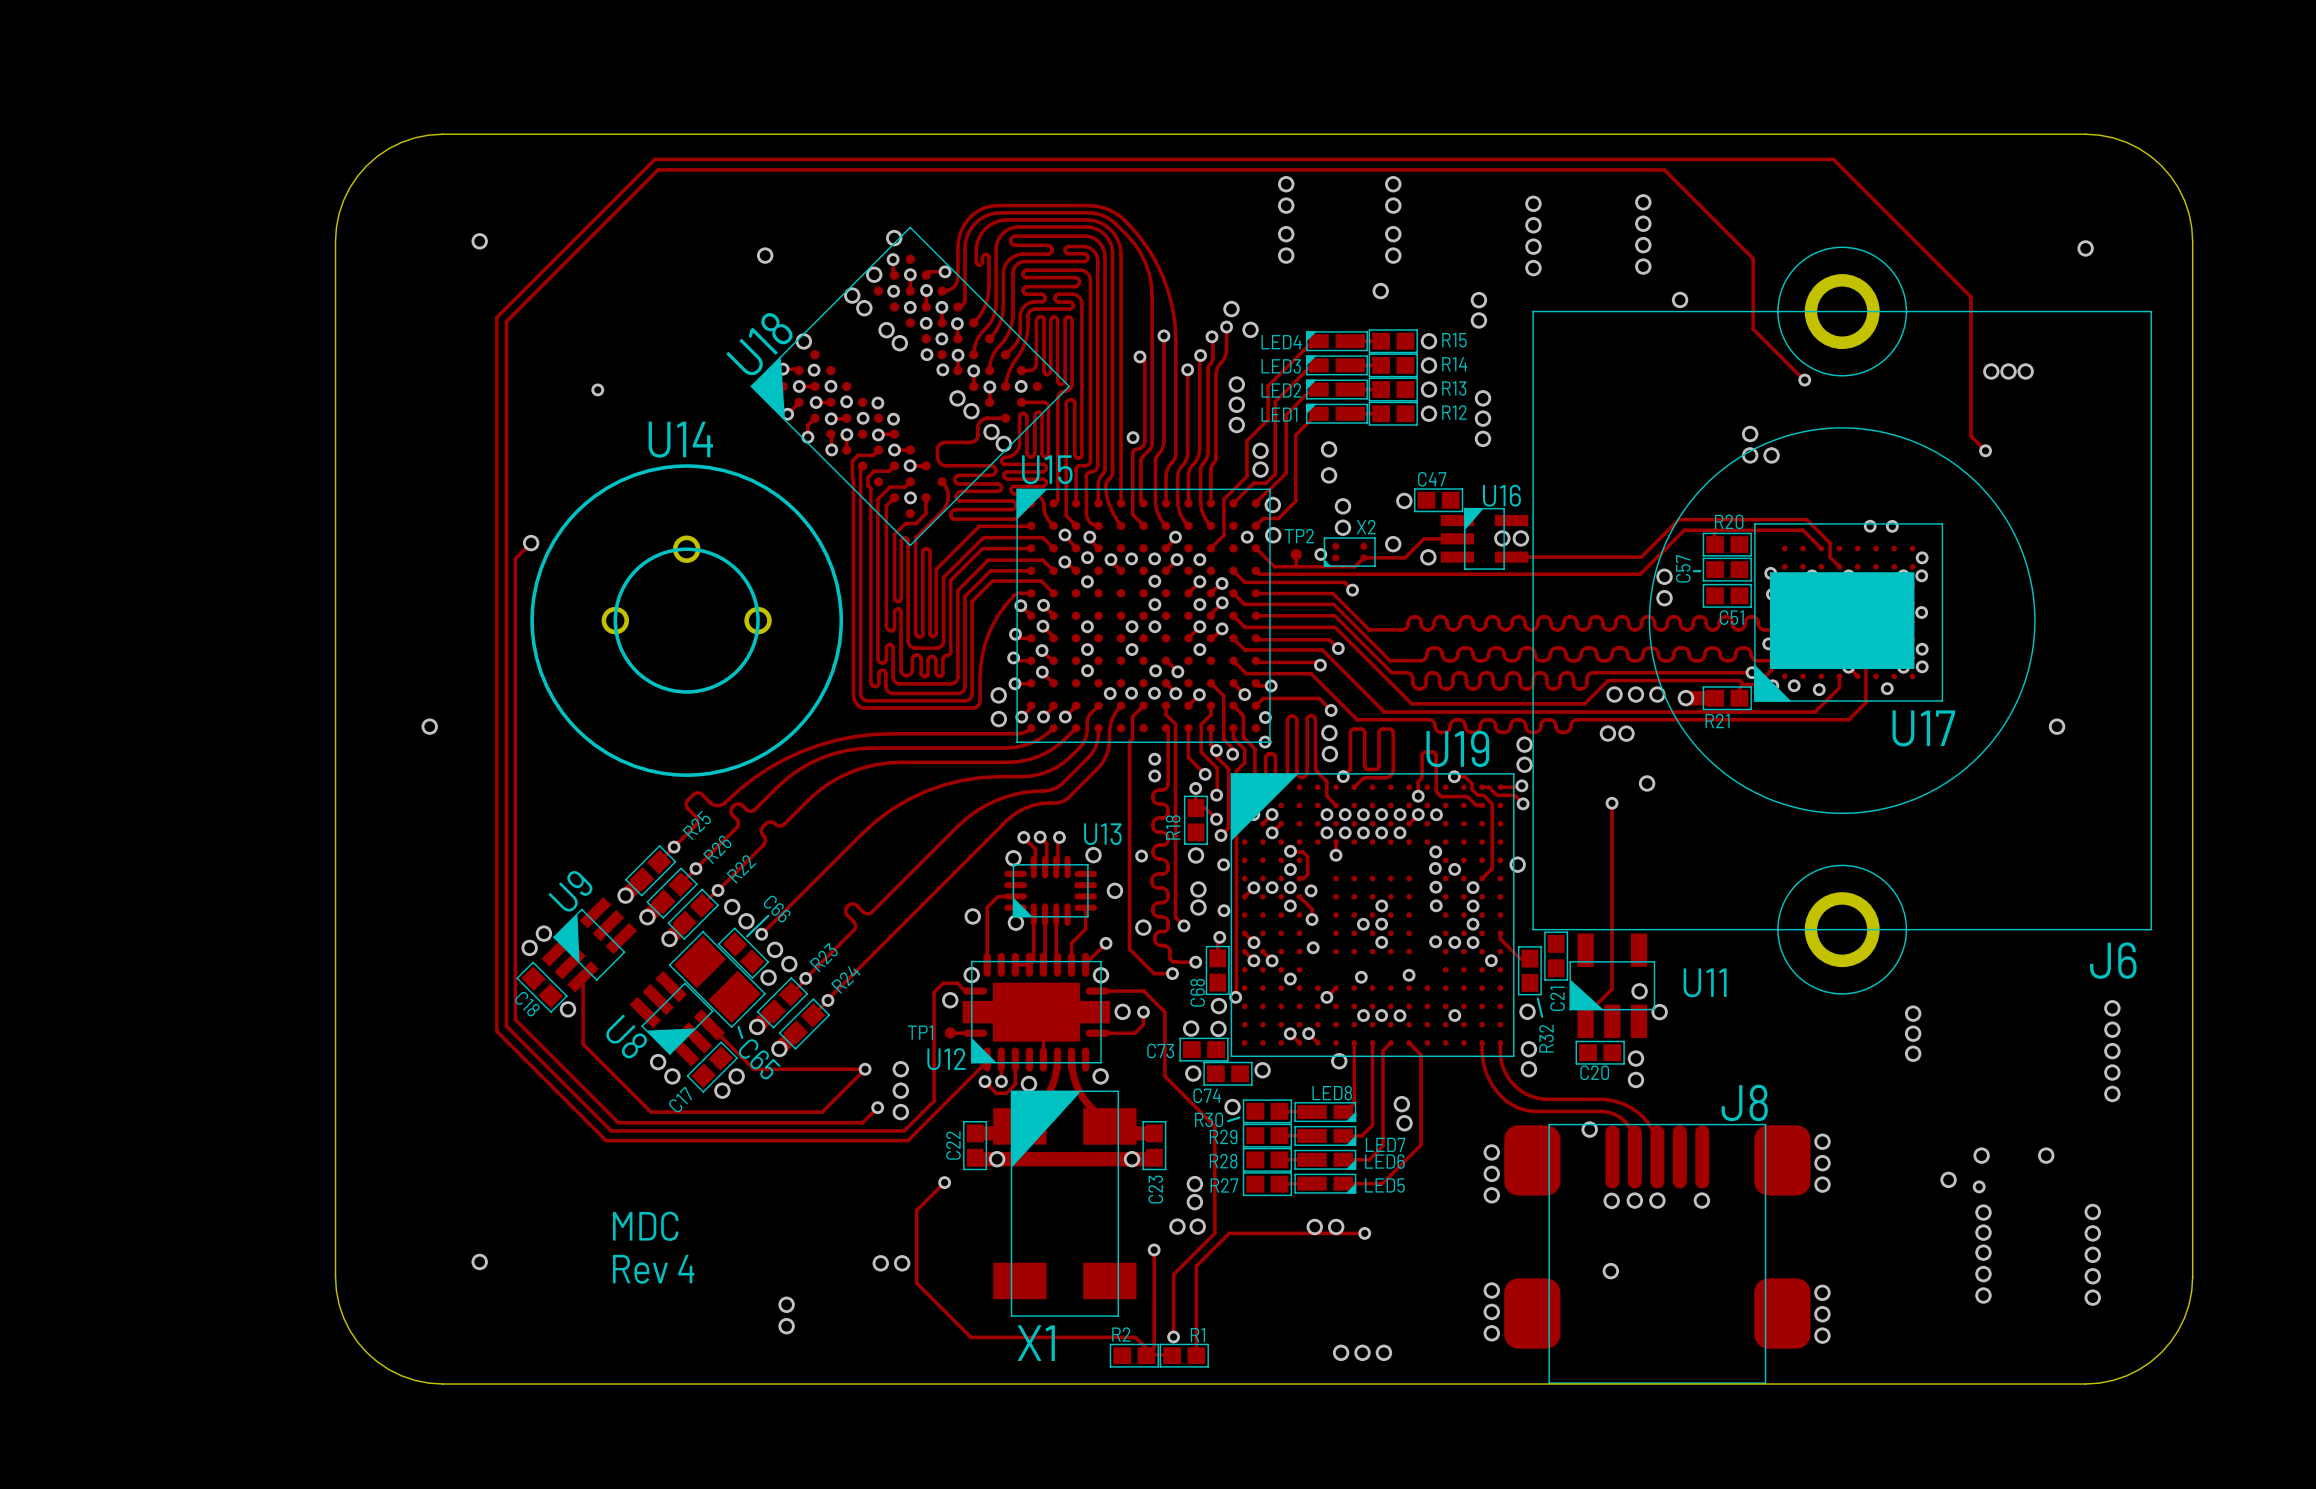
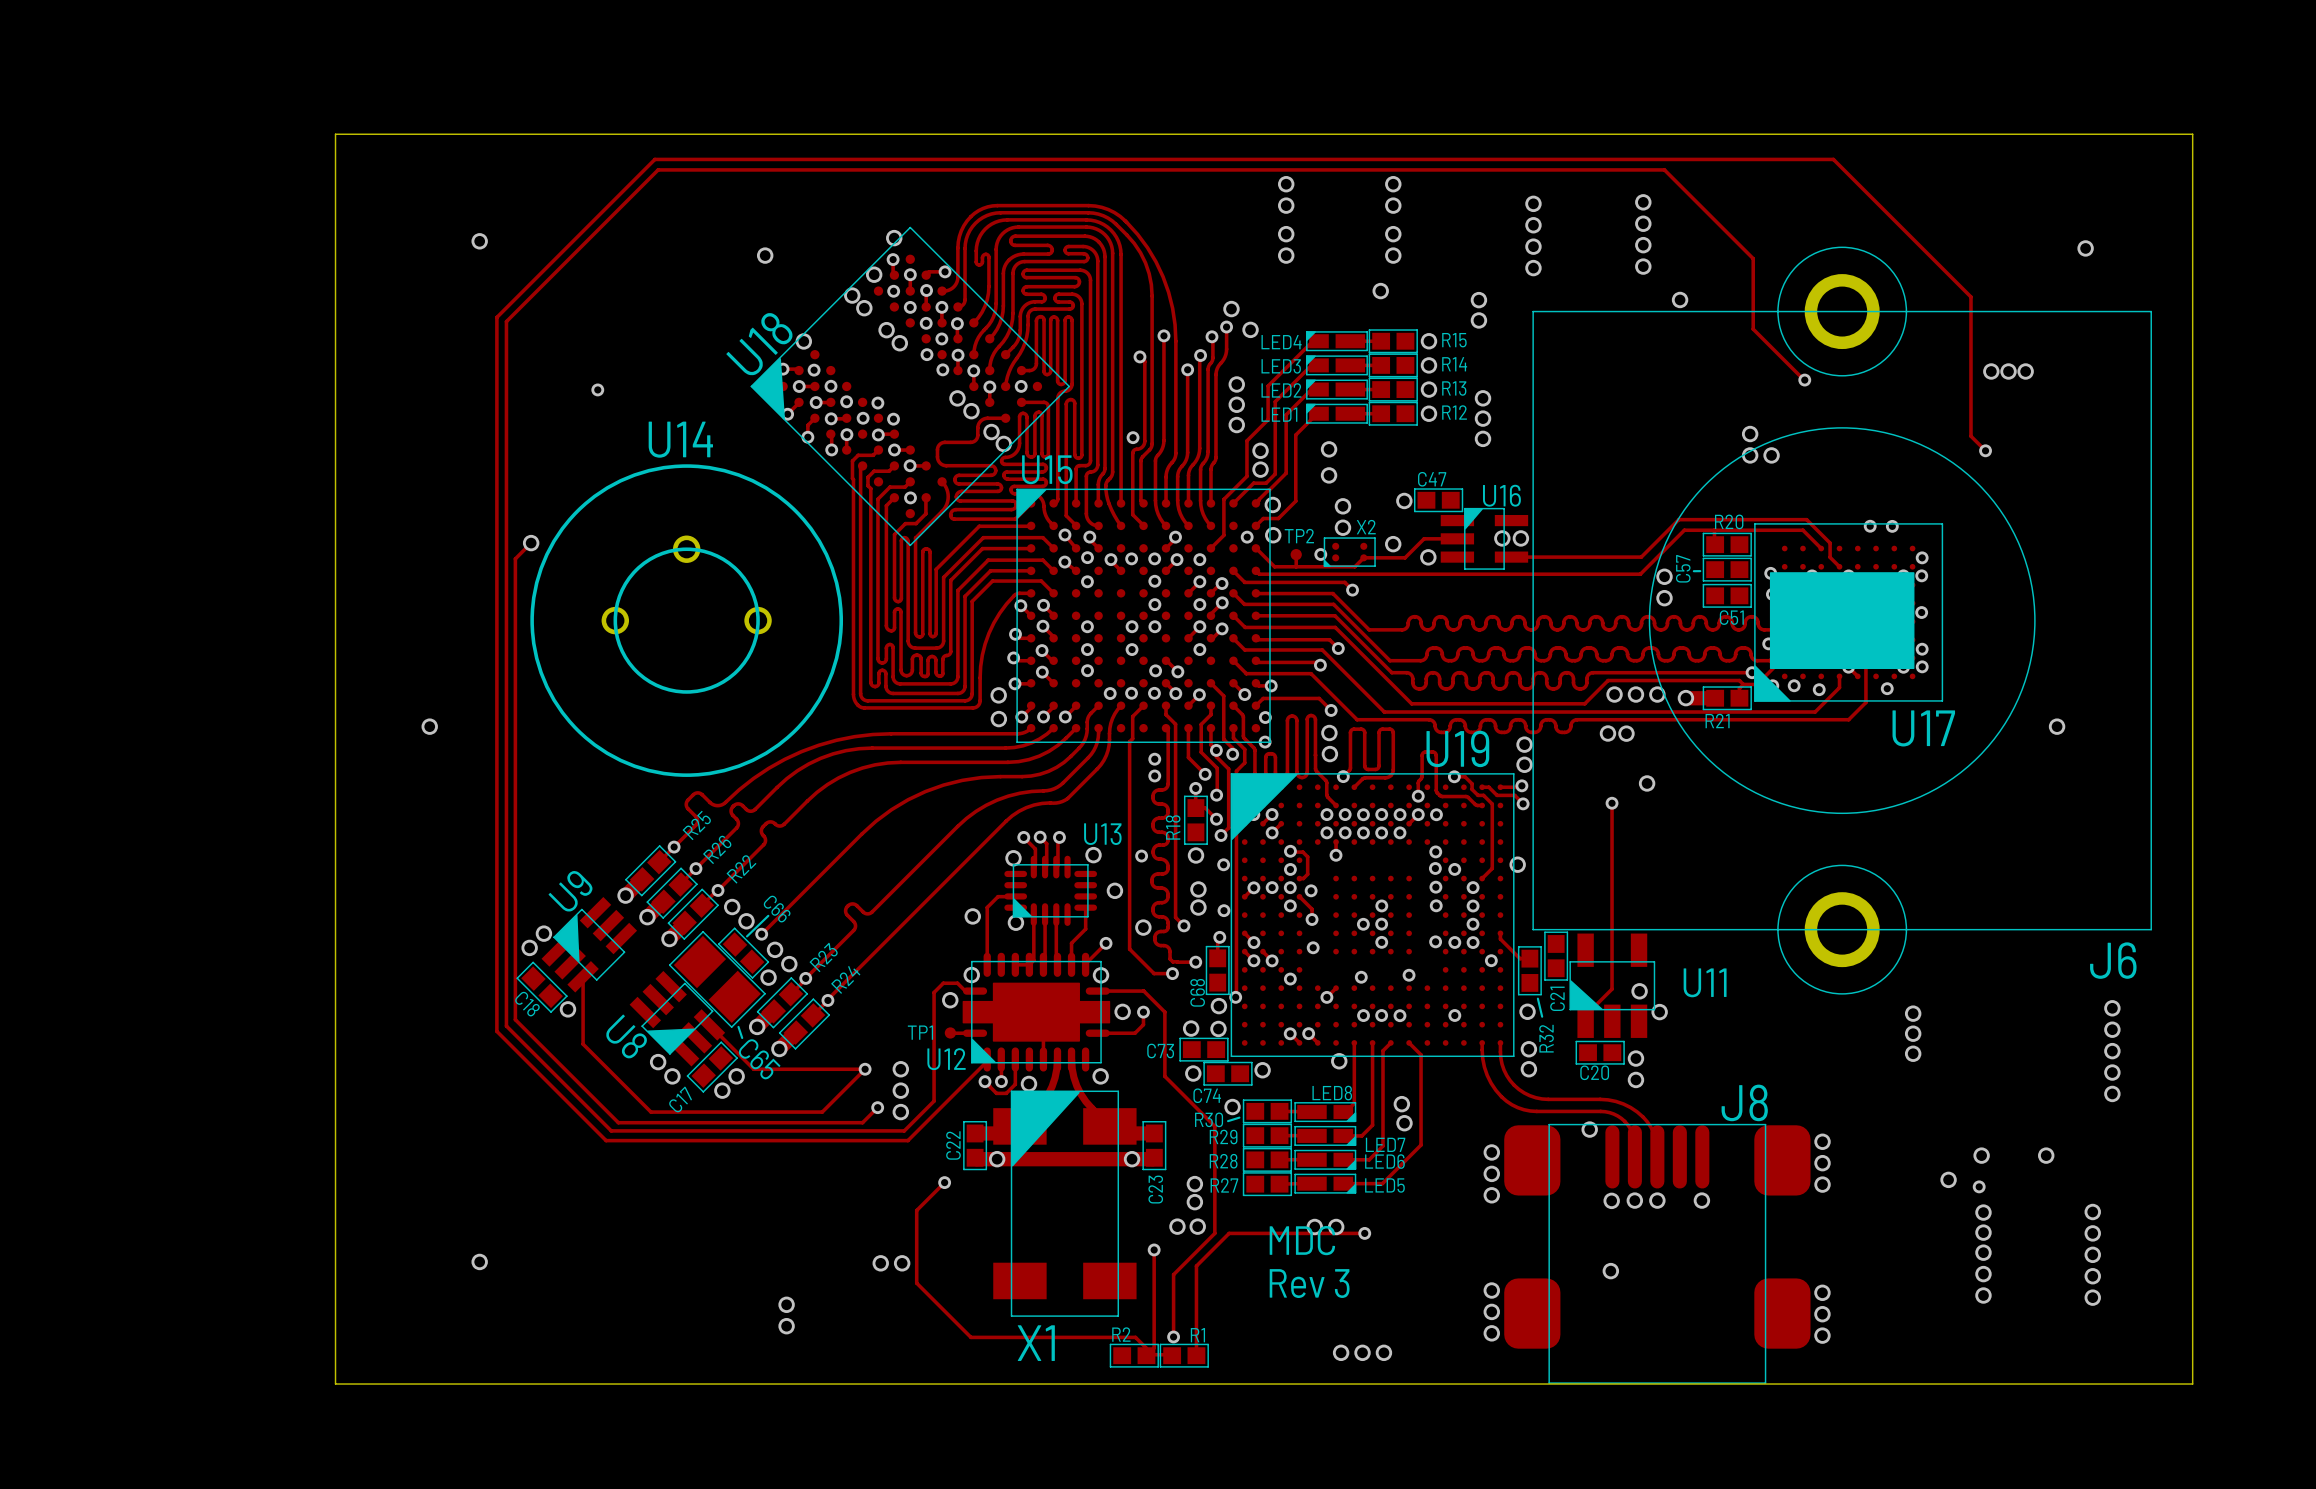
board edge: (442, 134) (414, 137) (401, 142) (389, 148) (366, 165) (349, 187) (343, 200) (339, 213) (335, 241) -> (442, 134) (335, 134) (335, 241)
board edge: (2085, 134) (2113, 137) (2126, 142) (2139, 148) (2161, 165) (2178, 187) (2184, 200) (2189, 213) (2192, 241) -> (2085, 134) (2192, 134) (2192, 241)
text position: MDC (645, 1226) -> MDC (1302, 1240)
text: Rev 4 (653, 1269) -> none
board edge: (335, 1276) (339, 1304) (343, 1317) (349, 1330) (366, 1352) (389, 1369) (401, 1375) (414, 1380) (442, 1384) -> (335, 1276) (335, 1384) (442, 1384)
board edge: (2192, 1276) (2189, 1304) (2184, 1317) (2178, 1330) (2161, 1352) (2139, 1369) (2126, 1375) (2113, 1380) (2085, 1384) -> (2192, 1276) (2192, 1384) (2085, 1384)
text: none -> Rev 3 (1309, 1283)

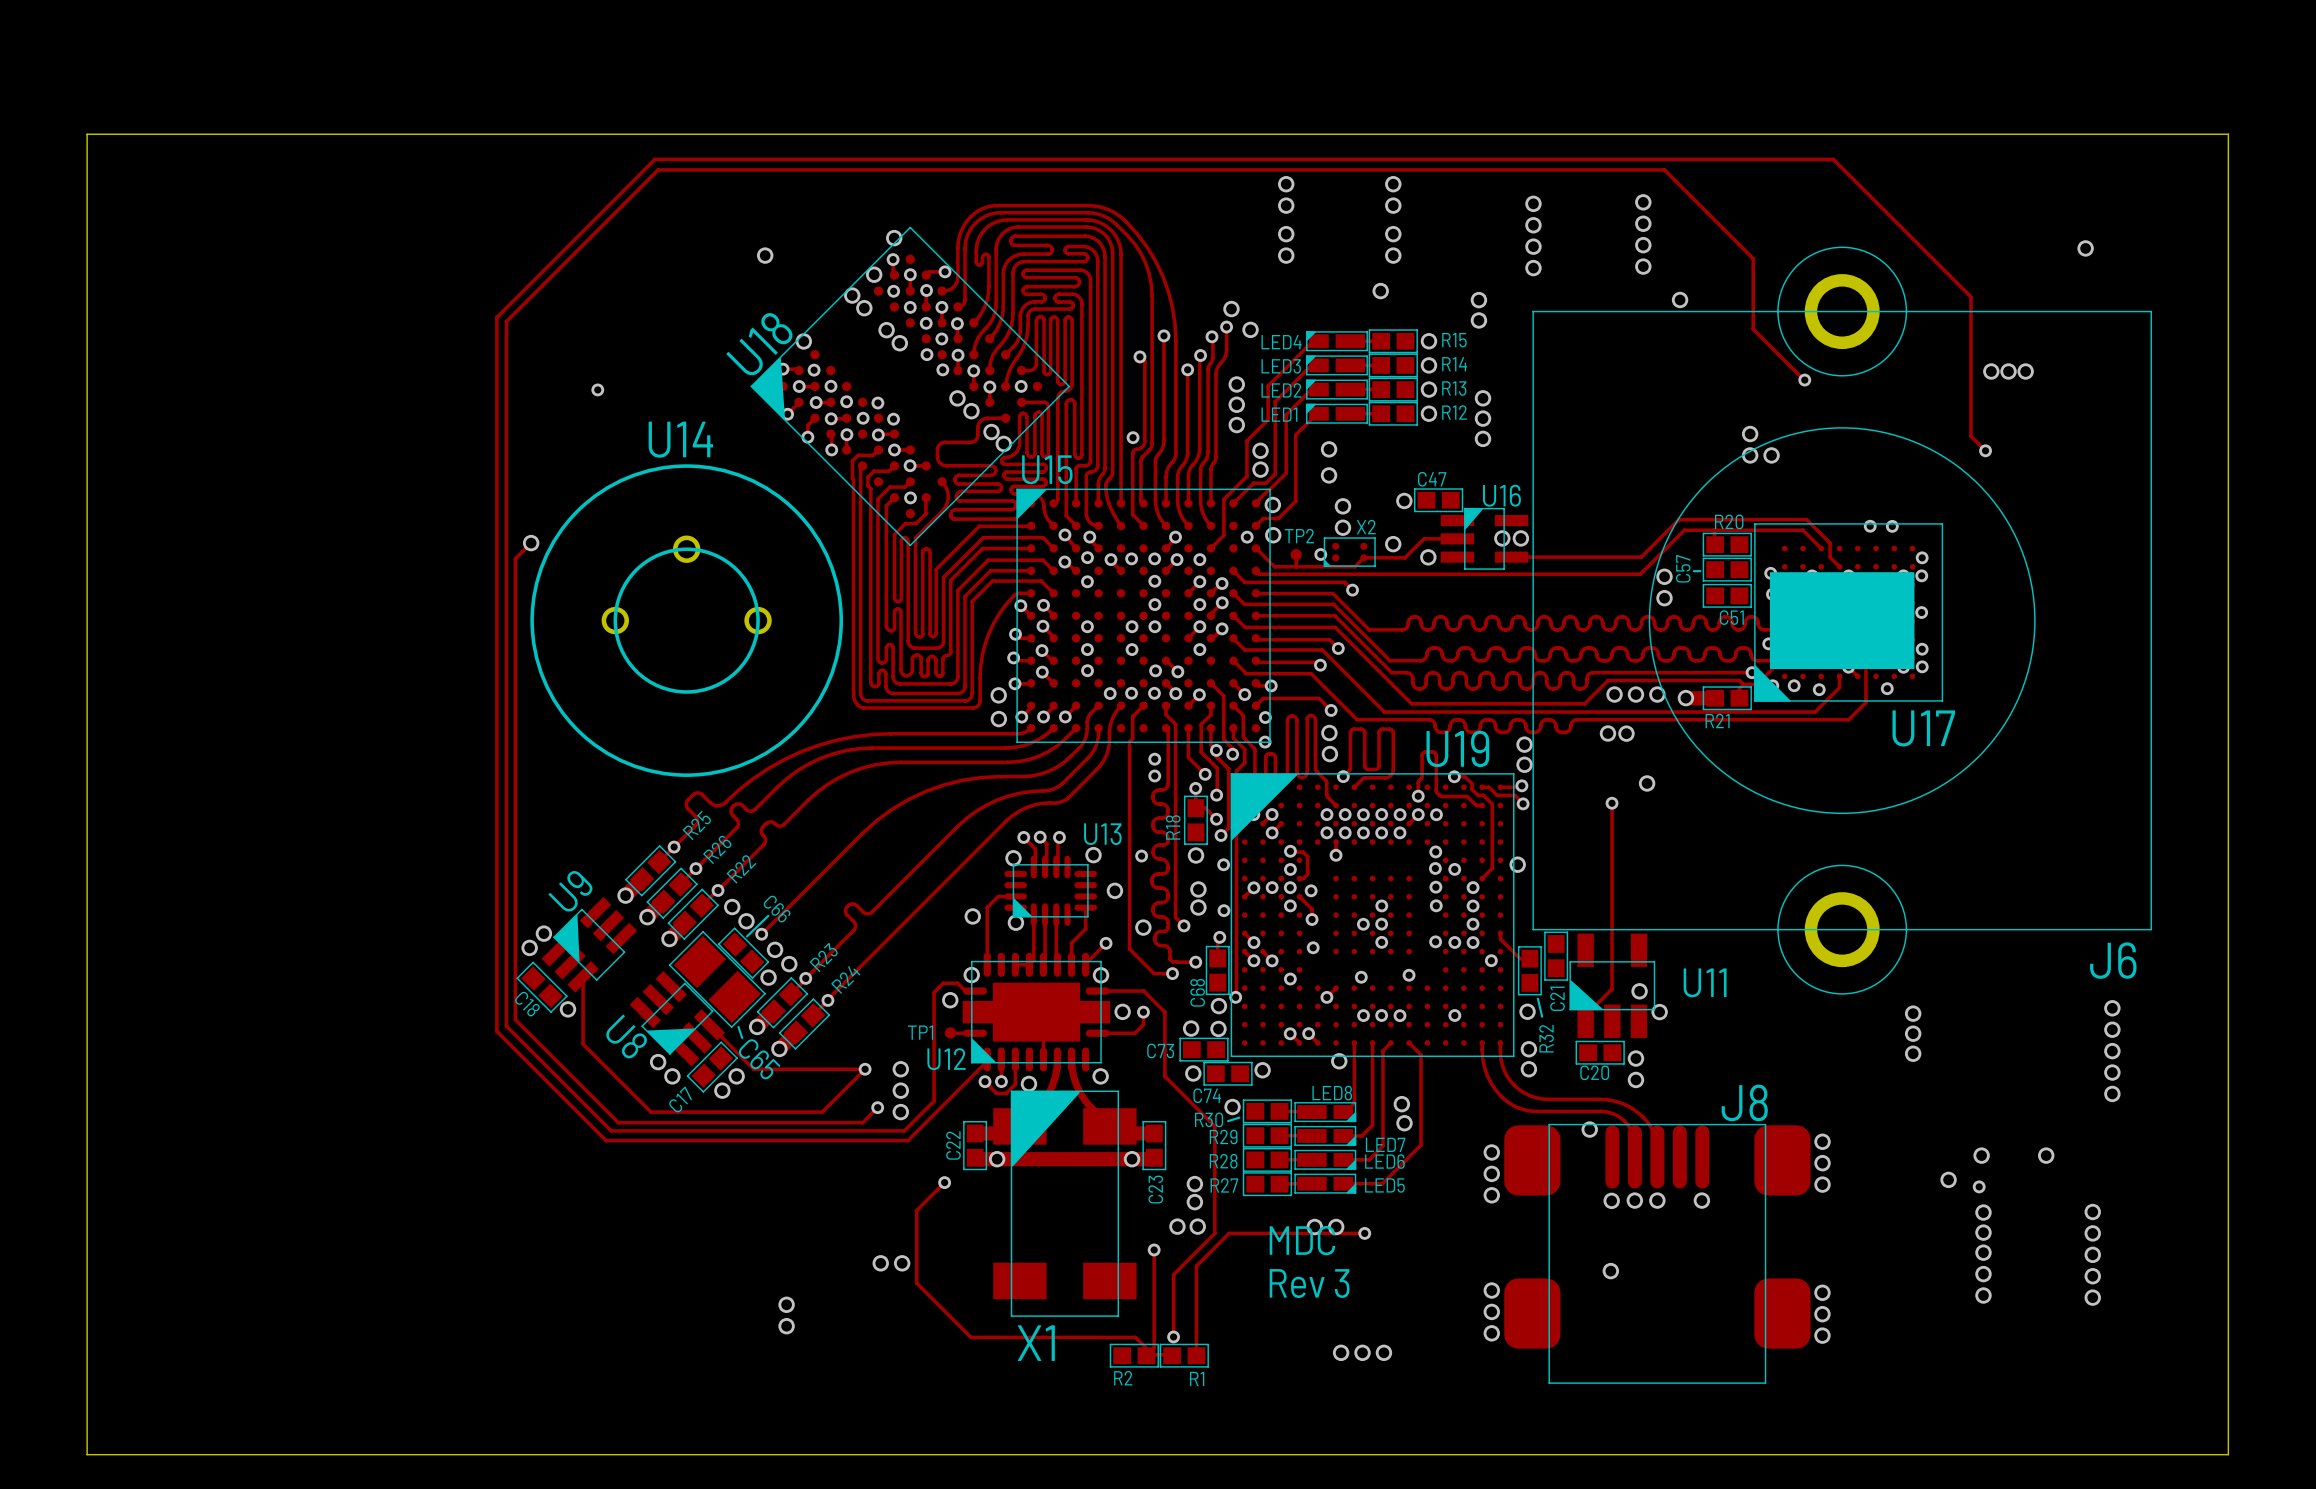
board edge: (335, 134) (335, 1384) (2192, 1384) (2192, 134) -> (335, 134) (87, 134) (87, 1454) (2228, 1454) (2228, 134) (2192, 134)
via: (479, 241) -> none
via: (429, 726) -> none
via: (2057, 726) -> none
via: (479, 1261) -> none
R2 name position: R2 (1121, 1334) -> R2 (1123, 1378)
R1 name position: R1 (1197, 1335) -> R1 (1197, 1378)

